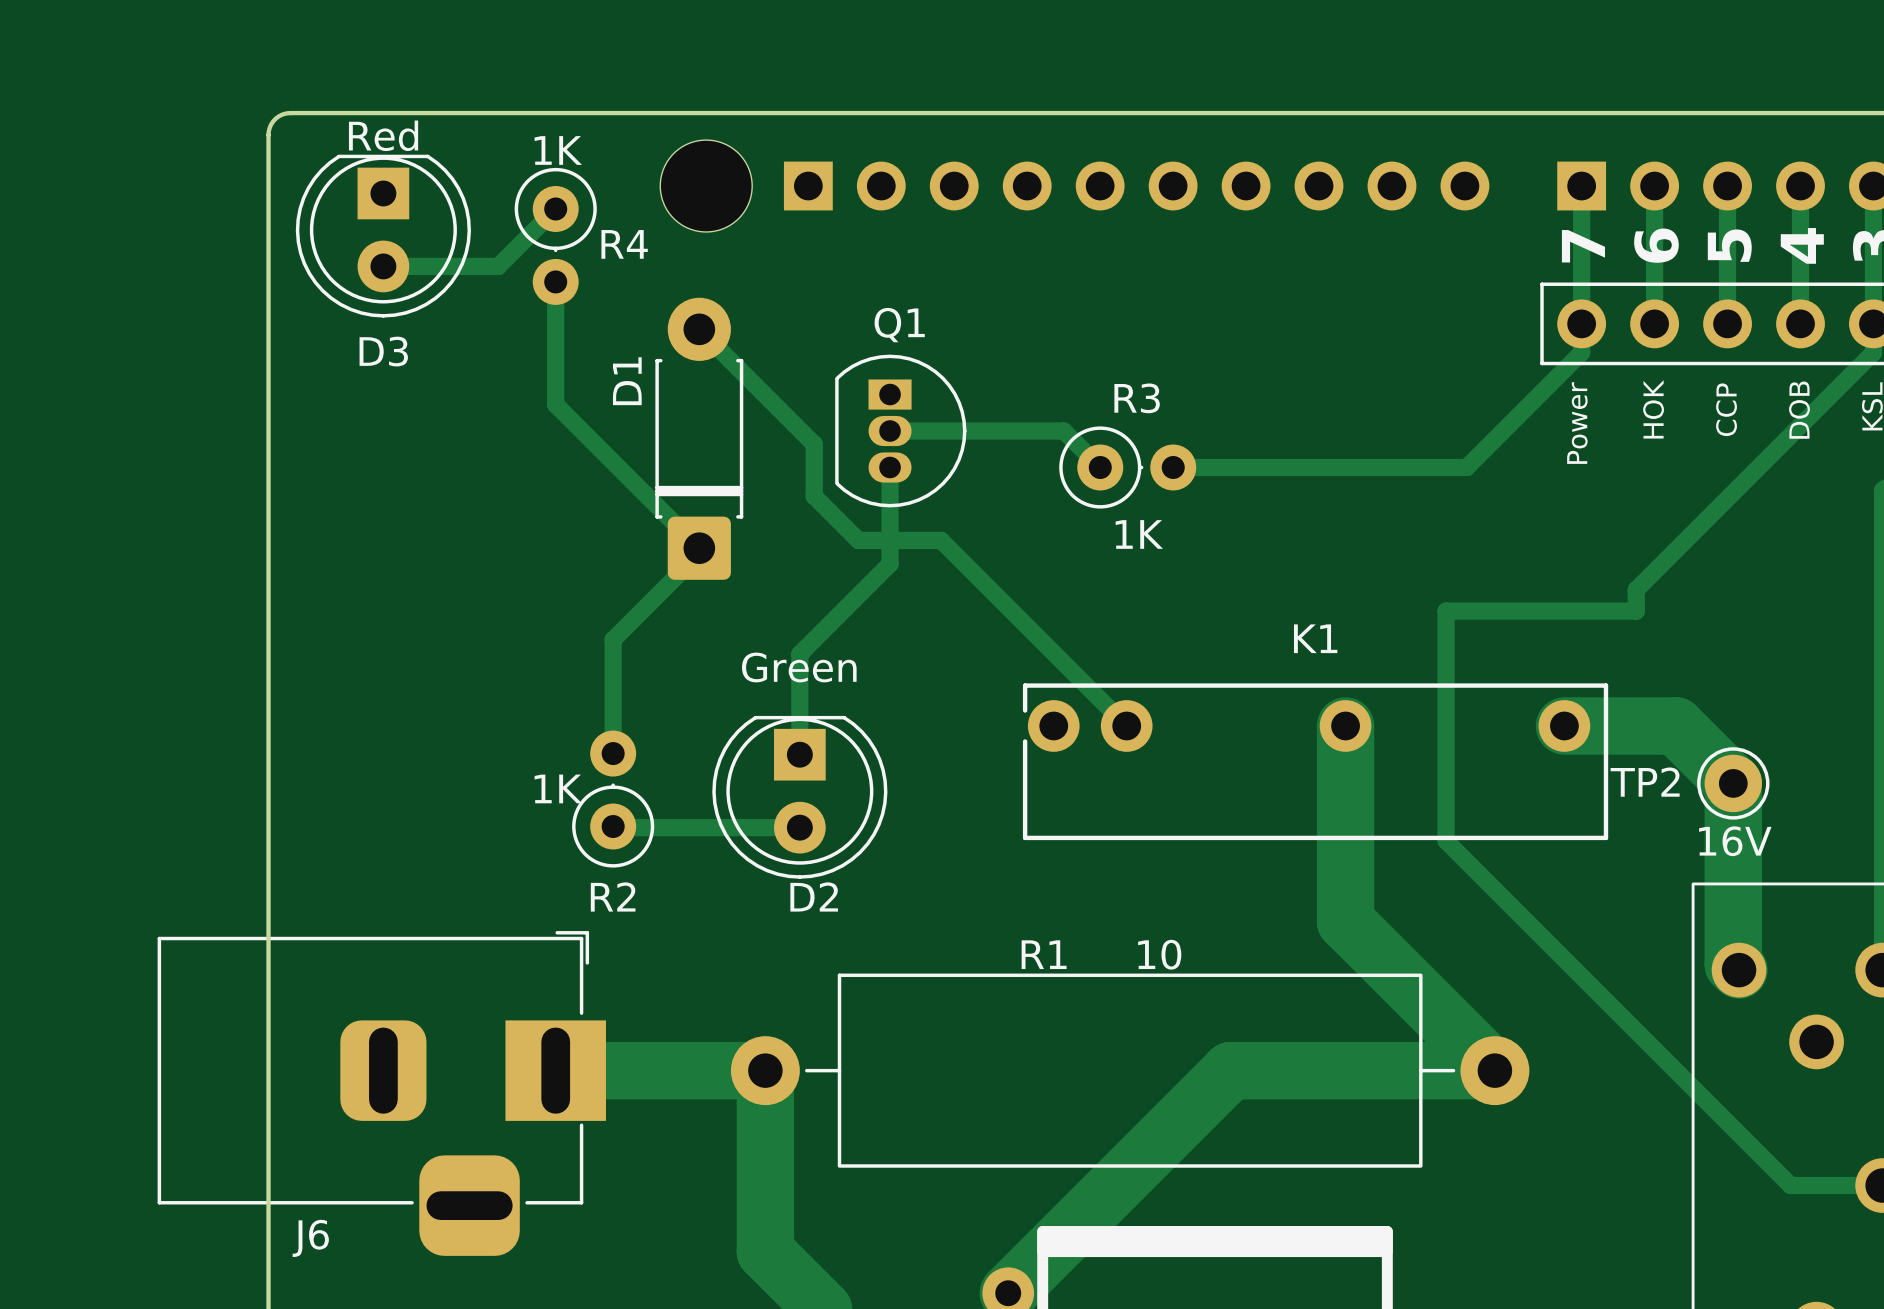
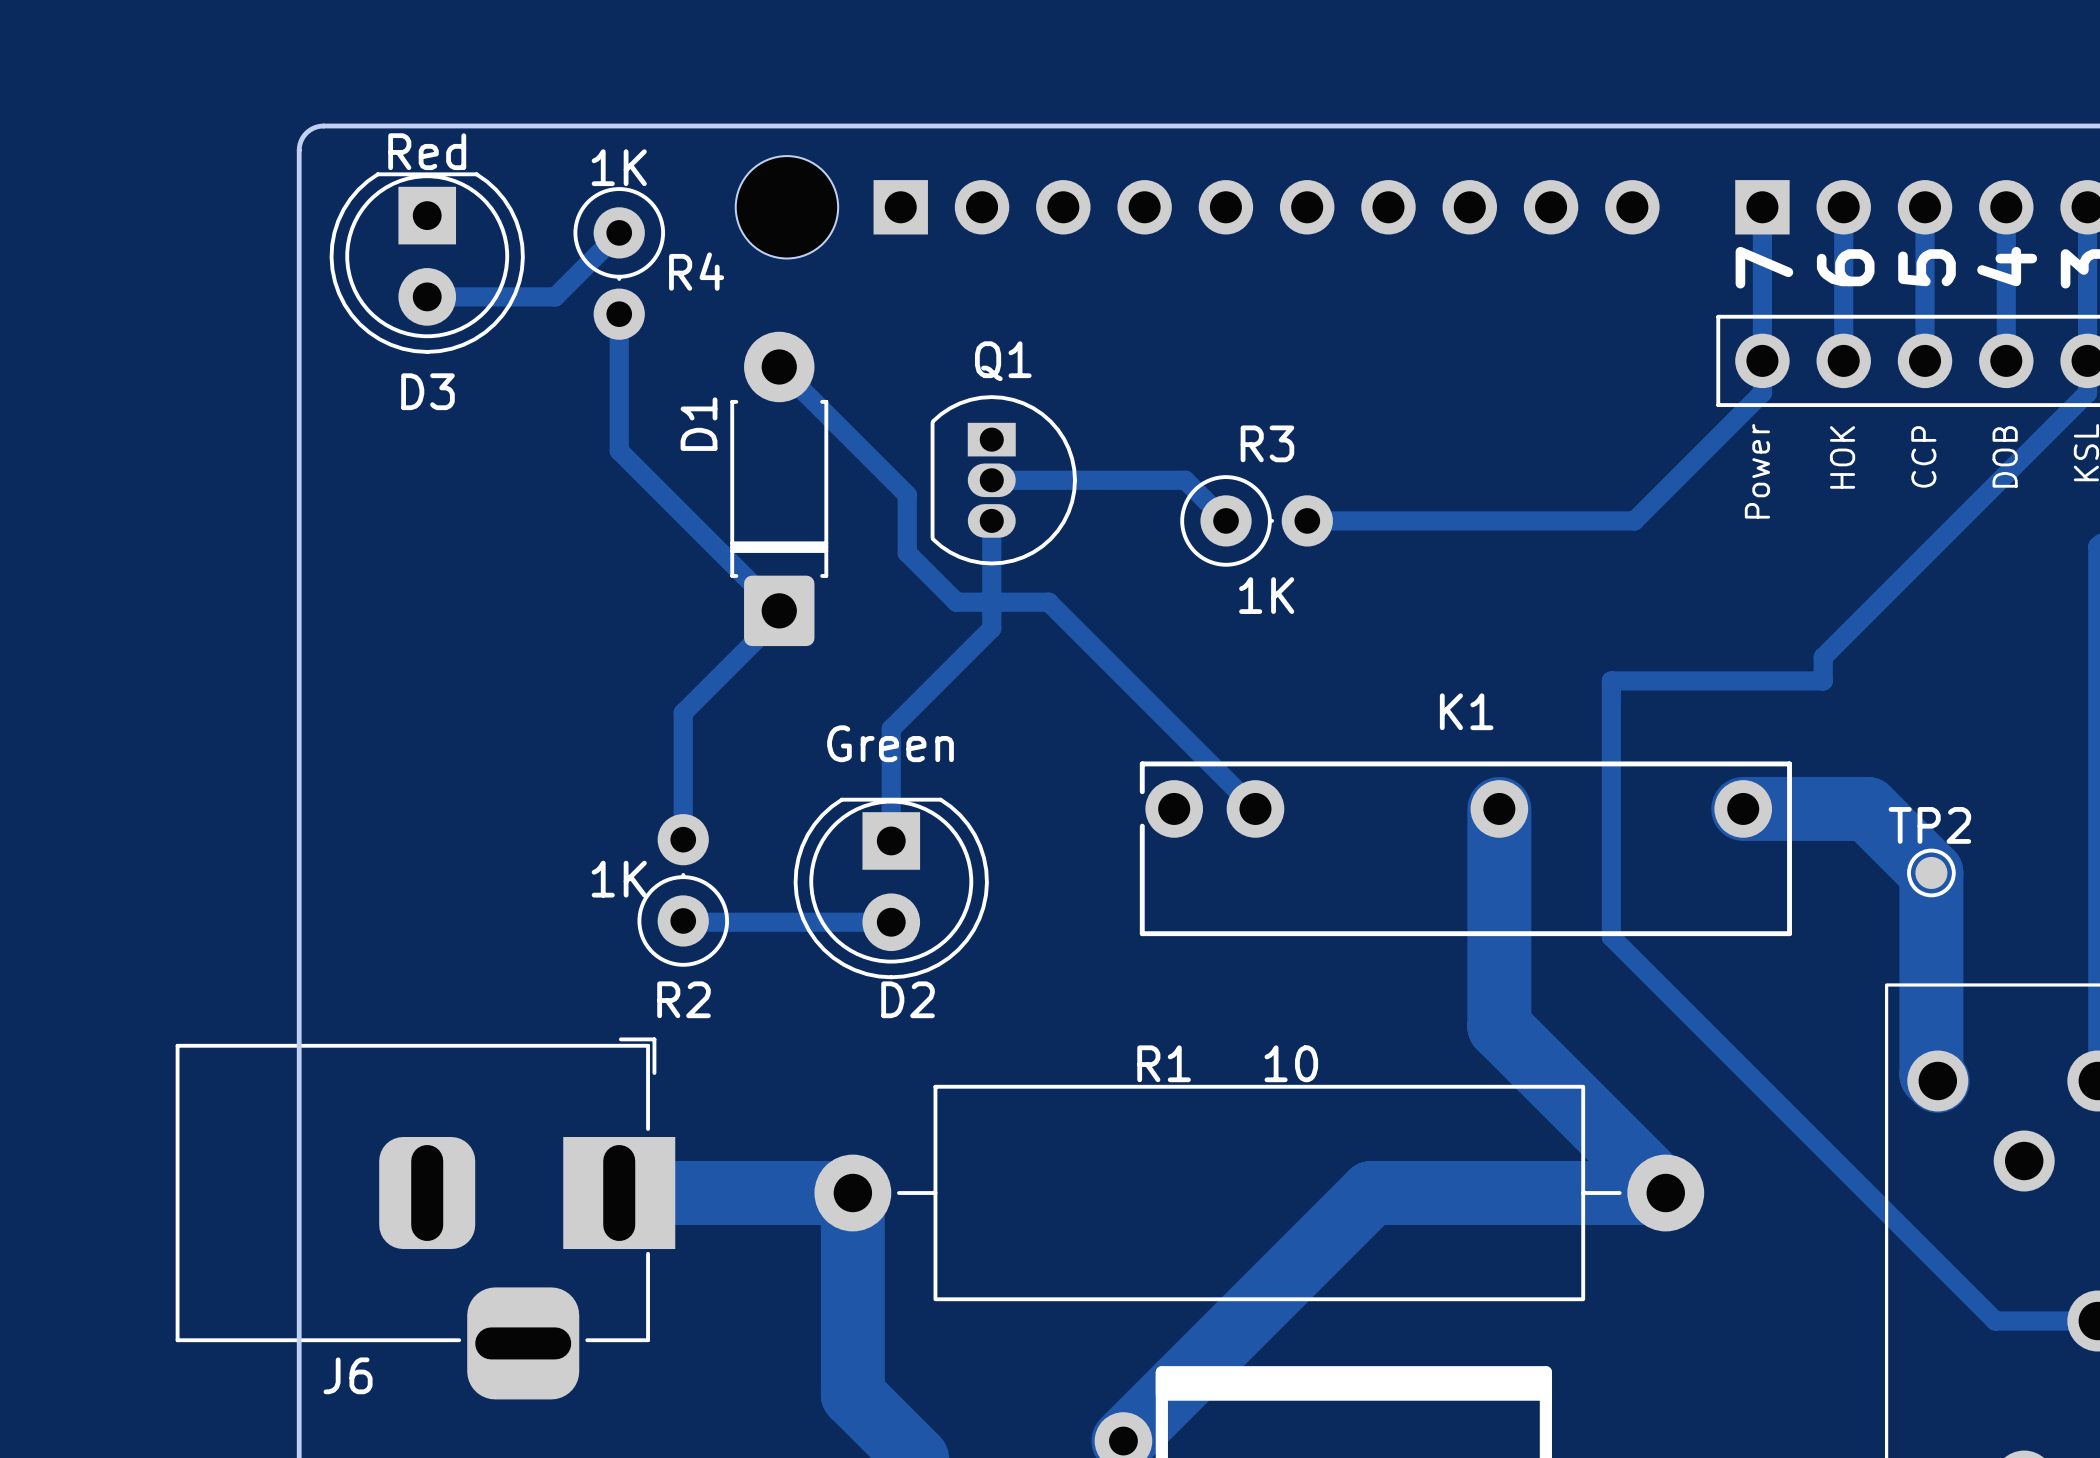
TP2 footprint: [1697, 747, 1770, 820] -> [1907, 848, 1956, 898]
TP2 name position: TP2 (1645, 782) -> TP2 (1929, 825)
TP2 value: 16V (1735, 841) -> none

